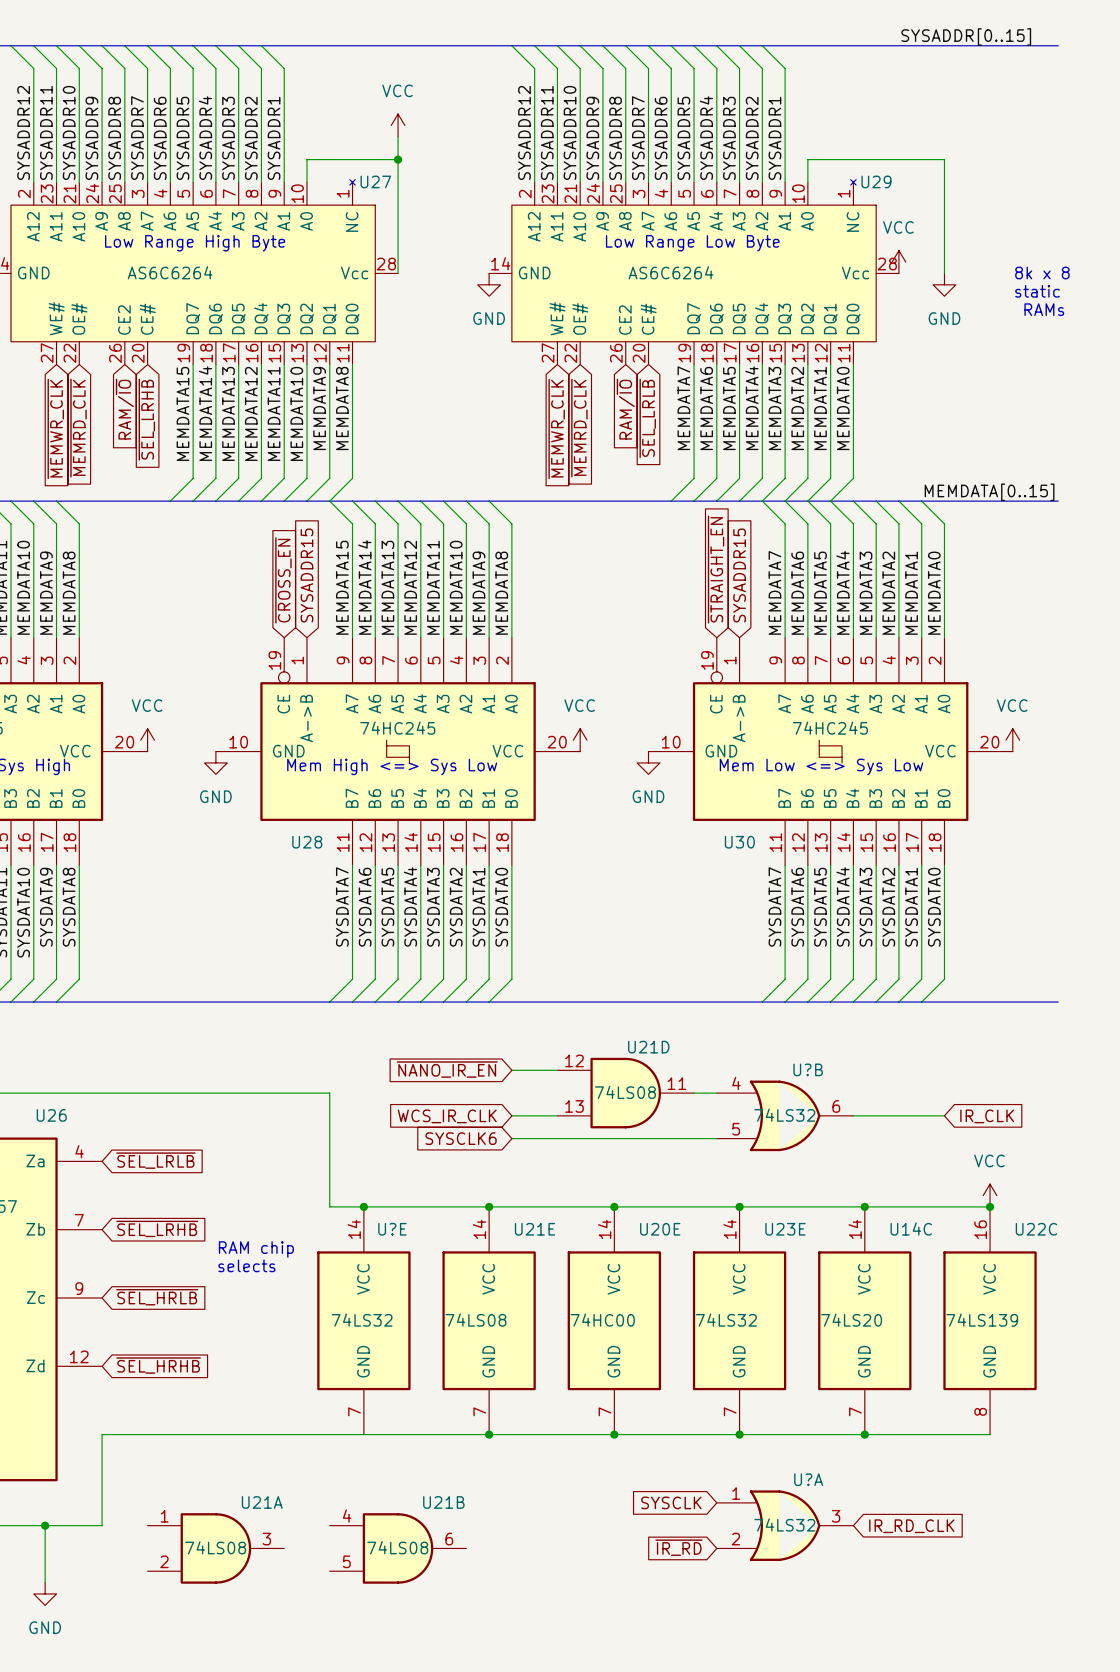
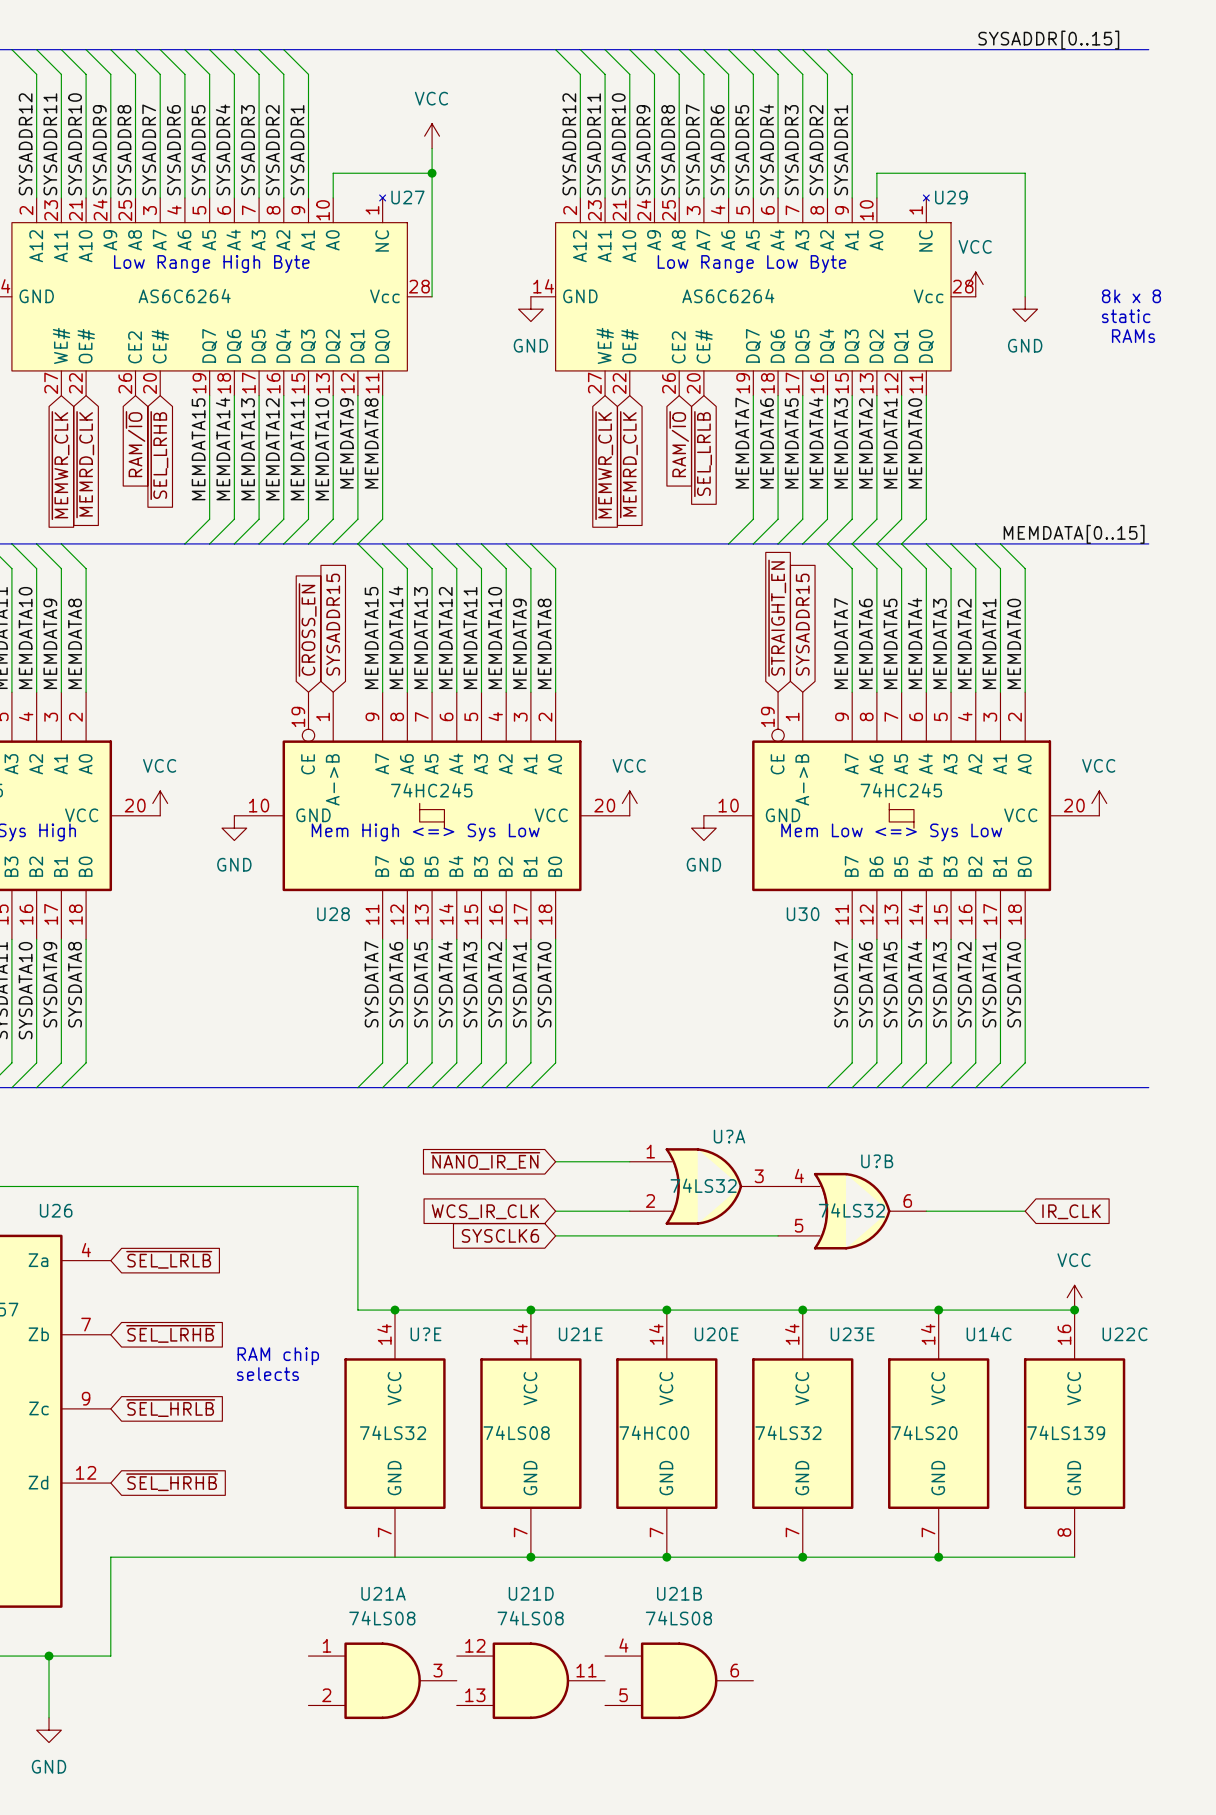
U21D name position: U21D (648, 1047) -> U21D (531, 1593)
U21D value position: 74LS08 (625, 1092) -> 74LS08 (530, 1618)
U21D position: (625, 1093) -> (530, 1680)
U?A: none -> 74LS32 (703, 1186)
U21A name position: U21A (262, 1502) -> U21A (383, 1593)
U21B name position: U21B (443, 1502) -> U21B (679, 1593)
global label: SYSCLK (671, 1502) -> none
U?A: 74LS32 (785, 1525) -> none
global label: IR_RD_CLK (911, 1526) -> none
U21A value position: 74LS08 (215, 1547) -> 74LS08 (382, 1618)
U21B value position: 74LS08 (397, 1547) -> 74LS08 (678, 1618)
global label: ~{IR_RD} (678, 1547) -> none
U21A position: (215, 1548) -> (382, 1680)
U21B position: (398, 1548) -> (679, 1680)

